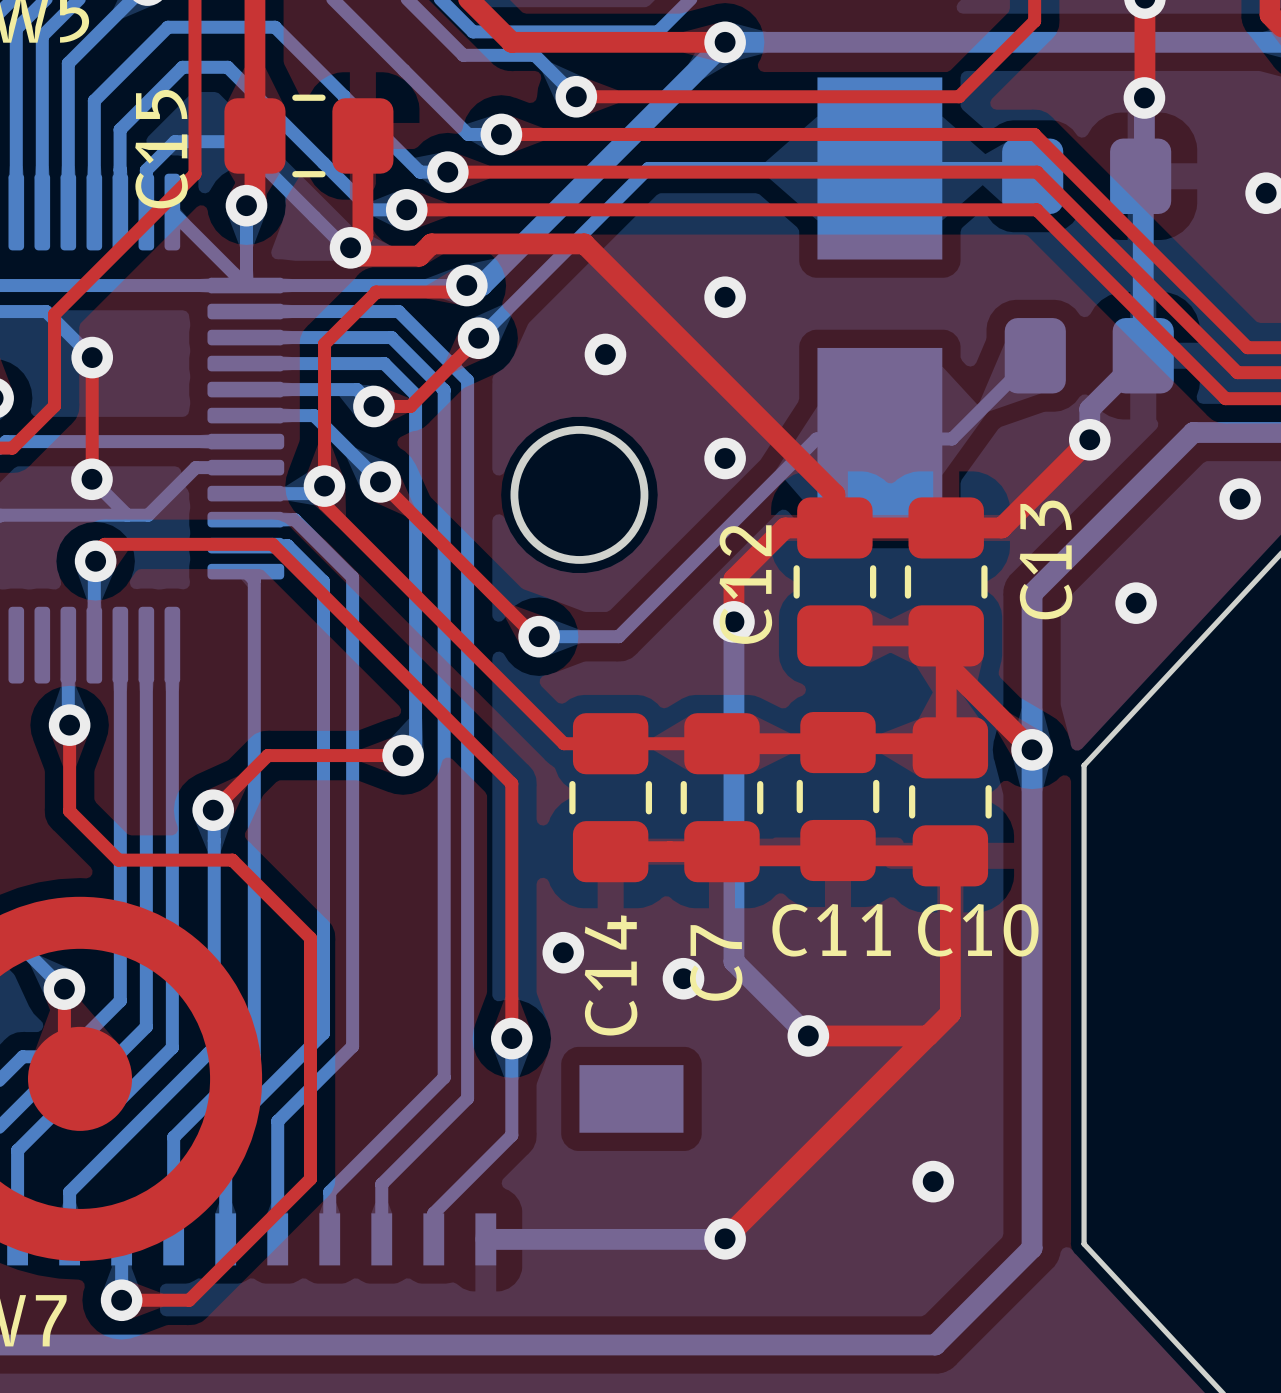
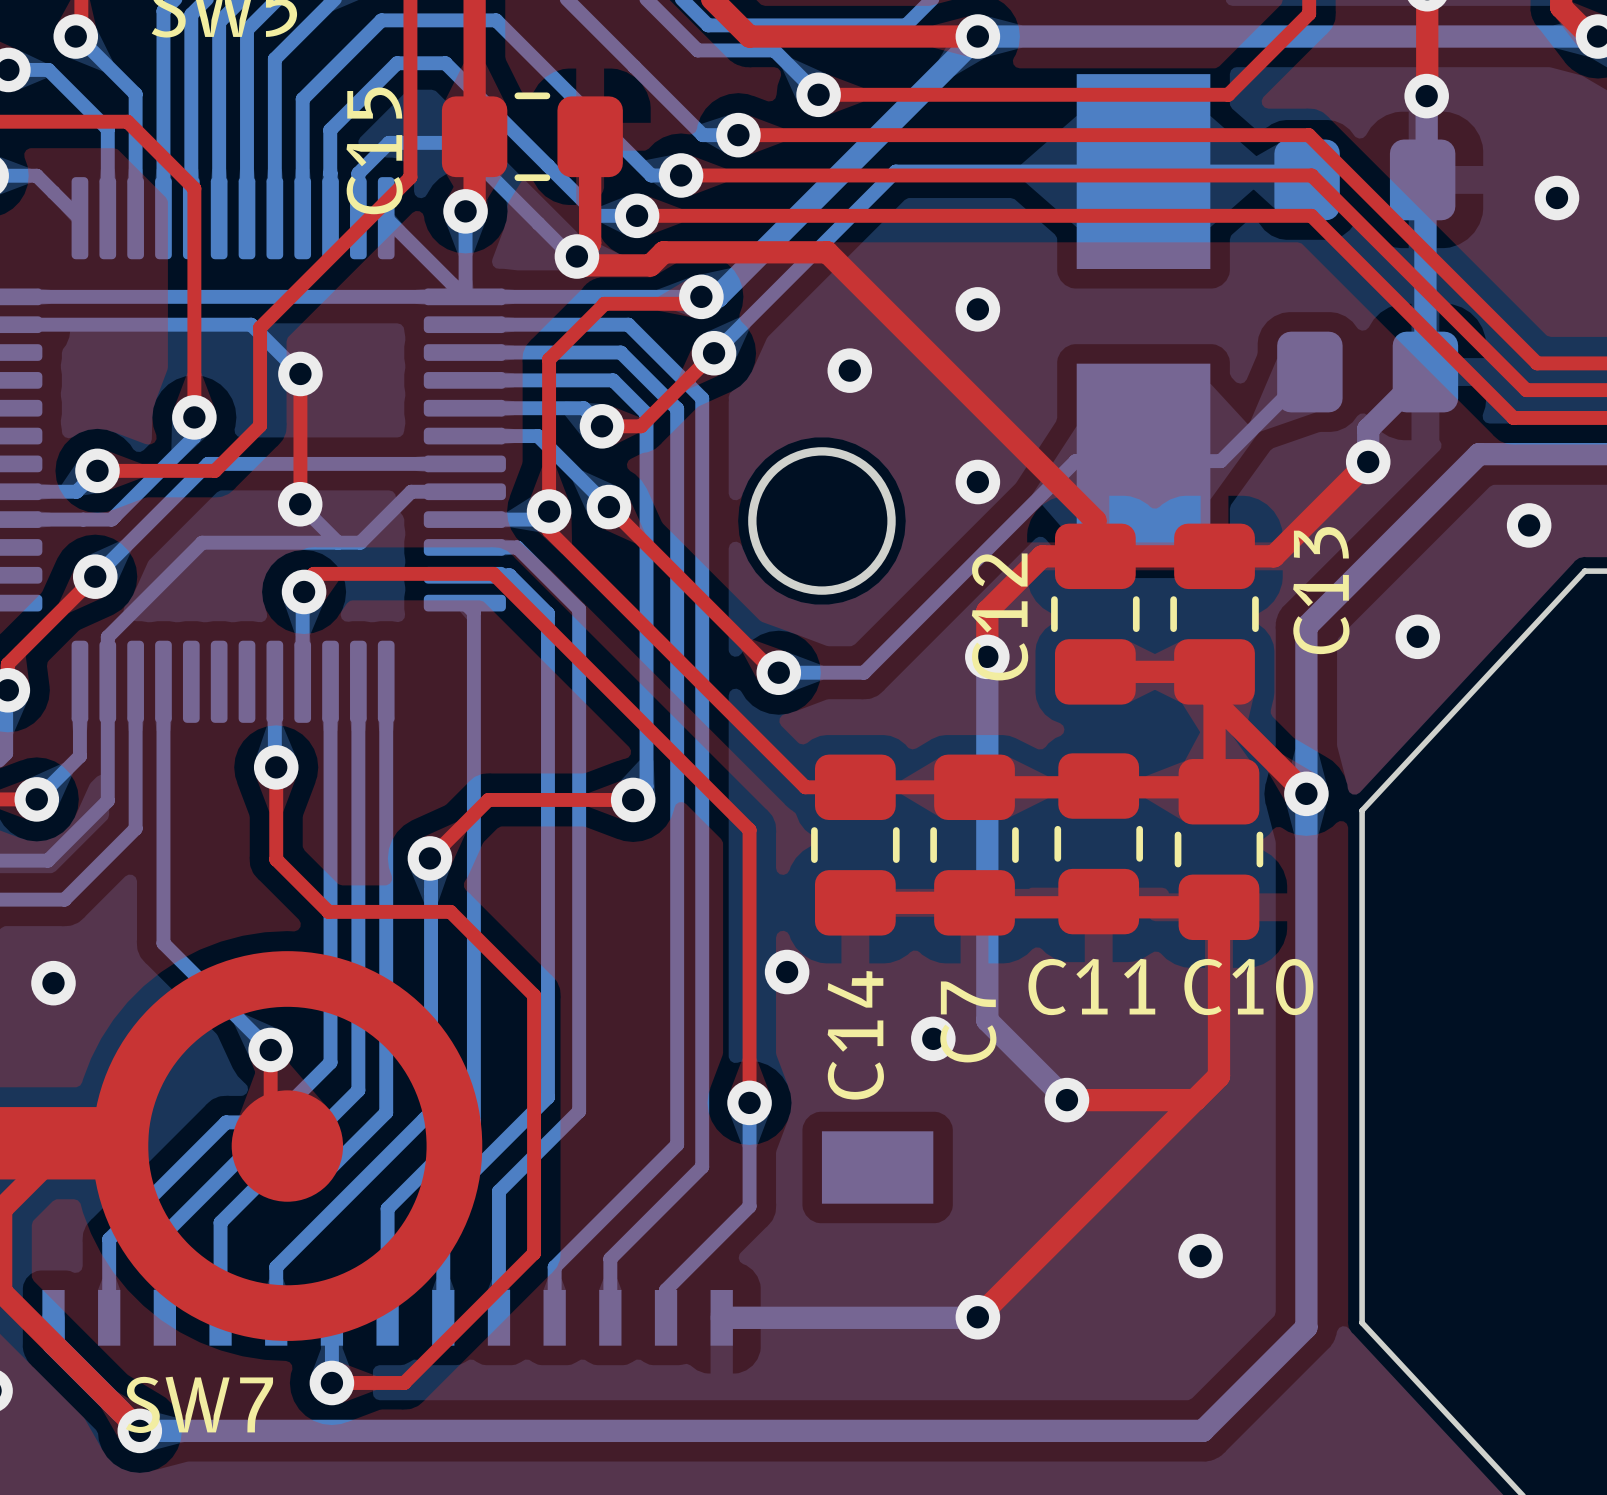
via position: (563, 952) -> (787, 972)

